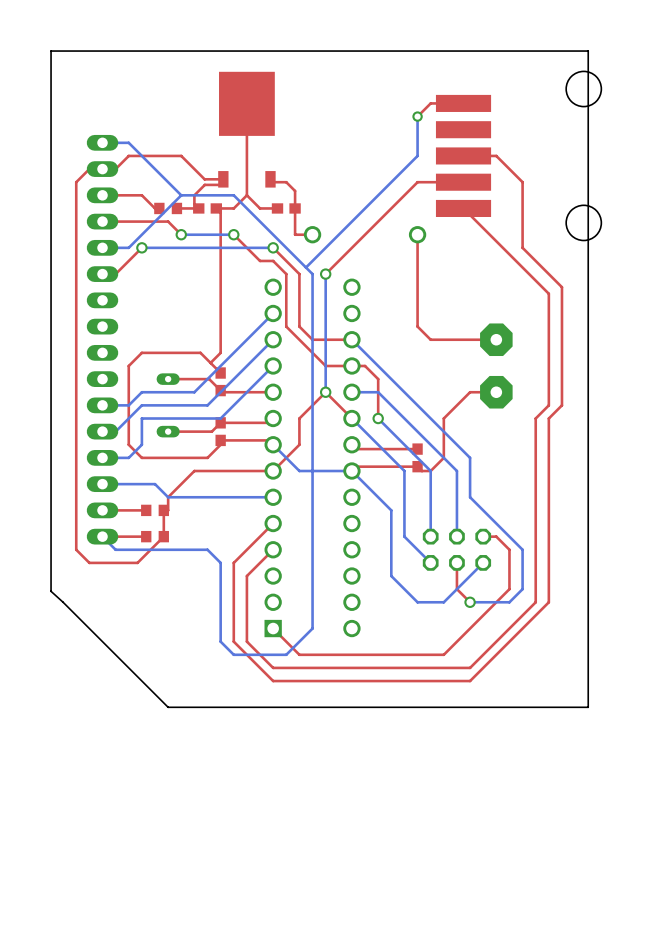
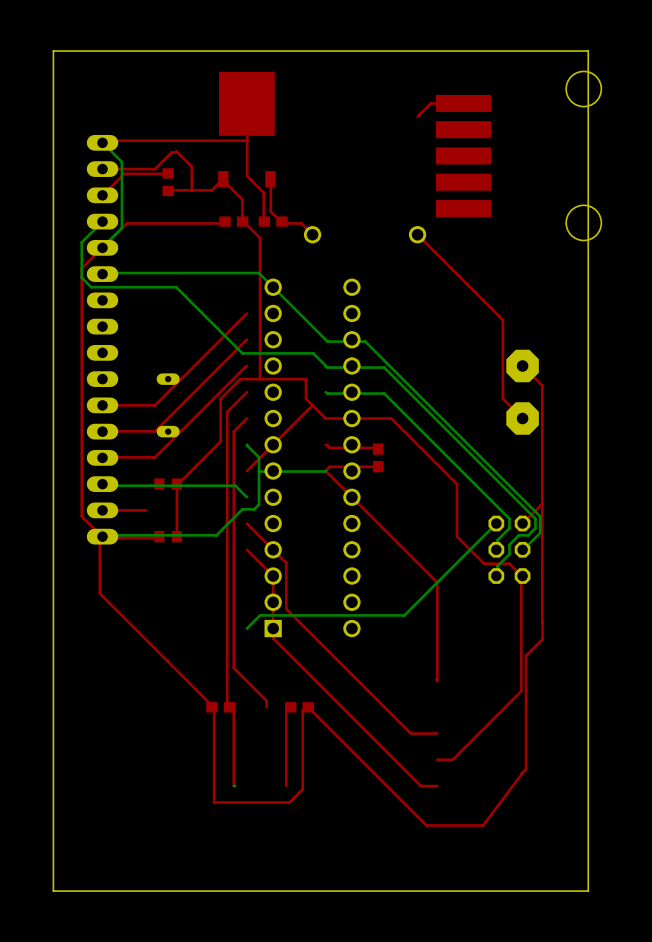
board edge: (53, 51) (51, 51) (51, 591) (168, 707) (588, 707) -> (53, 51) (53, 891) (588, 891) (588, 707)
top track: (246, 103) (246, 195) -> (246, 103) (247, 176) (263, 192) (264, 221)
bottom track: (417, 116) (417, 155) (305, 267) -> none
via: (417, 116) -> none
top track: none -> (247, 140) (103, 140) (102, 142)
bottom track: (102, 142) (128, 142) (181, 195) -> none
top track: none -> (176, 151) (191, 166) (191, 190)
top track: (463, 155) (496, 155) (522, 182) (522, 247) (561, 287) (561, 405) (548, 418) (548, 602) (470, 681) (273, 681) (233, 641) -> (266, 707) (266, 700) (233, 667) (233, 641)
top track: (102, 169) (89, 169) (76, 182) (76, 549) (89, 562) (137, 562) (163, 536) (163, 510) (168, 510) (168, 497) (194, 471) (273, 471) (299, 444) (299, 418) -> (246, 471) (299, 418)
top track: (115, 169) (128, 155) (181, 155) (204, 179) (223, 179) (223, 184) (204, 184) (194, 195) (194, 204) (198, 208) (176, 208) -> (115, 169) (155, 169) (171, 152) (176, 151)
top track: (270, 179) (273, 182) (286, 182) (295, 190) (295, 234) (312, 234) -> (270, 179) (270, 211) (282, 223) (301, 223) (312, 234)
top track: (463, 182) (417, 182) (325, 274) -> none
top track: none -> (168, 190) (211, 190) (223, 179) (242, 199) (242, 221) (260, 238) (260, 379)
top track: (102, 195) (141, 195) (155, 208) (159, 208) -> (102, 195) (124, 173) (168, 173)
bottom track: (181, 195) (128, 247) (102, 247) -> (102, 142) (121, 161) (121, 228) (102, 247)
bottom track: (181, 195) (233, 195) (312, 274) (312, 628) (286, 654) (233, 654) (220, 641) (220, 562) (207, 549) (115, 549) (102, 536) -> (246, 444) (258, 457) (258, 504) (254, 509) (242, 509) (216, 535) (102, 536)
top track: (246, 195) (260, 208) (277, 208) -> none
top track: (246, 195) (233, 208) (216, 208) (220, 212) (220, 352) (210, 362) -> none
part rotation: 0° (168, 208) -> 90° clockwise (168, 182)
part position: (168, 208) -> (168, 182)
part: (207, 208) -> none
part position: (286, 208) -> (273, 221)
top track: (463, 208) (548, 293) (548, 405) (535, 418) (535, 602) (470, 667) (273, 667) (246, 641) (246, 576) (273, 549) -> none
top track: (102, 221) (168, 221) (181, 234) -> none
bottom track: none -> (102, 221) (81, 242) (81, 277) (91, 287) (176, 287) (242, 353) (313, 353) (327, 367) (384, 367) (535, 518) (535, 528) (528, 535) (518, 535) (509, 544) (509, 554) (497, 566) (496, 576)
top track: none -> (225, 221) (223, 223) (126, 223) (81, 268) (81, 516) (102, 536)
part: none -> (233, 221)
via: (181, 234) -> none
top track: (233, 234) (260, 260) (273, 260) (286, 274) (286, 326) (325, 365) (365, 365) (378, 379) (378, 418) -> none
bottom track: (233, 234) (181, 234) -> none
via: (233, 234) -> none
top track: (417, 234) (417, 326) (430, 339) (496, 339) -> (417, 234) (502, 320) (502, 398) (522, 418)
top track: (141, 247) (115, 274) (102, 274) -> none
via: (141, 247) -> none
top track: (273, 247) (299, 274) (299, 326) (312, 339) (351, 339) -> none
bottom track: (273, 247) (141, 247) -> none
via: (273, 247) -> none
bottom track: none -> (102, 274) (258, 273) (327, 341) (365, 341) (540, 516) (540, 532) (522, 549)
bottom track: (325, 274) (325, 392) -> (496, 549) (497, 540) (509, 528) (509, 518) (384, 393) (325, 392)
via: (325, 274) -> none
top track: none -> (246, 313) (155, 405) (102, 405)
bottom track: (273, 313) (194, 392) (141, 392) (128, 405) (102, 405) -> none
top track: none -> (246, 339) (155, 431) (102, 431)
bottom track: (273, 339) (207, 405) (141, 405) (115, 431) (102, 431) -> none
bottom track: (351, 339) (470, 457) (470, 497) (522, 549) (522, 589) (509, 602) (470, 602) -> none
top track: none -> (246, 365) (155, 457) (102, 457)
bottom track: (273, 365) (220, 418) (141, 418) (141, 444) (128, 457) (102, 457) -> none
part position: (496, 365) -> (522, 392)
top track: none -> (522, 365) (542, 385) (542, 639) (526, 655) (526, 769) (521, 774)
top track: (220, 373) (200, 352) (141, 352) (128, 365) (128, 444) (141, 457) (207, 457) (220, 444) (220, 441) -> (176, 536) (176, 484) (220, 441)
top track: (168, 379) (209, 379) (222, 392) (273, 392) -> none
part: (220, 381) -> none
top track: none -> (246, 392) (227, 411) (227, 707) (233, 707) (233, 786)
via: (325, 392) -> none
bottom track: (351, 392) (378, 392) (456, 471) (456, 536) -> none
top track: (496, 392) (470, 392) (443, 418) (443, 457) (430, 471) (421, 471) (417, 466) (356, 466) (351, 471) -> none
top track: (312, 405) (325, 392) (351, 418) -> none
top track: (273, 418) (268, 422) (220, 422) (211, 431) (168, 431) -> none
bottom track: (351, 418) (404, 471) (404, 536) (430, 562) -> none
bottom track: (378, 418) (430, 471) (430, 536) -> none
via: (378, 418) -> none
part: (220, 431) -> none
top track: (220, 440) (268, 440) (273, 444) -> (220, 440) (220, 398) (240, 379) (305, 379) (305, 398) (325, 418) (391, 418) (456, 484) (456, 536) (483, 563) (509, 563) (522, 576) (521, 691) (452, 759) (437, 759)
bottom track: (273, 444) (299, 471) (351, 471) (391, 510) (391, 576) (417, 602) (443, 602) (483, 562) -> none
top track: none -> (325, 444) (329, 447) (378, 449)
top track: (351, 444) (356, 449) (417, 449) -> none
part position: (417, 457) -> (378, 457)
top track: none -> (379, 464) (377, 466) (329, 466) (325, 471) (437, 582) (437, 681) (436, 679)
bottom track: none -> (325, 471) (258, 471)
bottom track: (102, 484) (155, 484) (168, 497) (273, 497) -> (102, 484) (103, 485) (235, 485) (246, 497)
part: none -> (168, 484)
top track: none -> (542, 503) (522, 523)
part: (155, 510) -> none
top track: none -> (246, 523) (286, 562) (286, 608) (411, 733) (437, 733)
top track: (273, 523) (233, 562) -> (246, 418) (233, 431) (233, 562)
bottom track: none -> (496, 523) (404, 615) (260, 615) (246, 628)
top track: none -> (102, 536) (99, 539) (99, 593) (211, 707) (214, 707) (214, 802) (289, 802) (302, 789) (302, 710) (308, 707)
top track: (146, 536) (102, 536) -> (159, 536) (102, 536)
part position: (155, 536) -> (168, 536)
top track: (483, 536) (496, 536) (509, 549) (509, 589) (443, 654) (299, 654) (273, 628) -> none
top track: none -> (246, 549) (273, 576) (273, 638) (420, 786) (437, 786)
part rotation: 0° (456, 549) -> 90° clockwise (509, 549)
part position: (456, 549) -> (509, 549)
top track: (456, 562) (456, 589) (470, 602) -> none
via: (470, 602) -> none
part: none -> (220, 707)
top track: none -> (290, 707) (286, 707) (286, 786)
part: none -> (299, 707)
top track: none -> (308, 707) (426, 825) (483, 825) (522, 772)
bottom track: none -> (235, 785) (233, 786)

